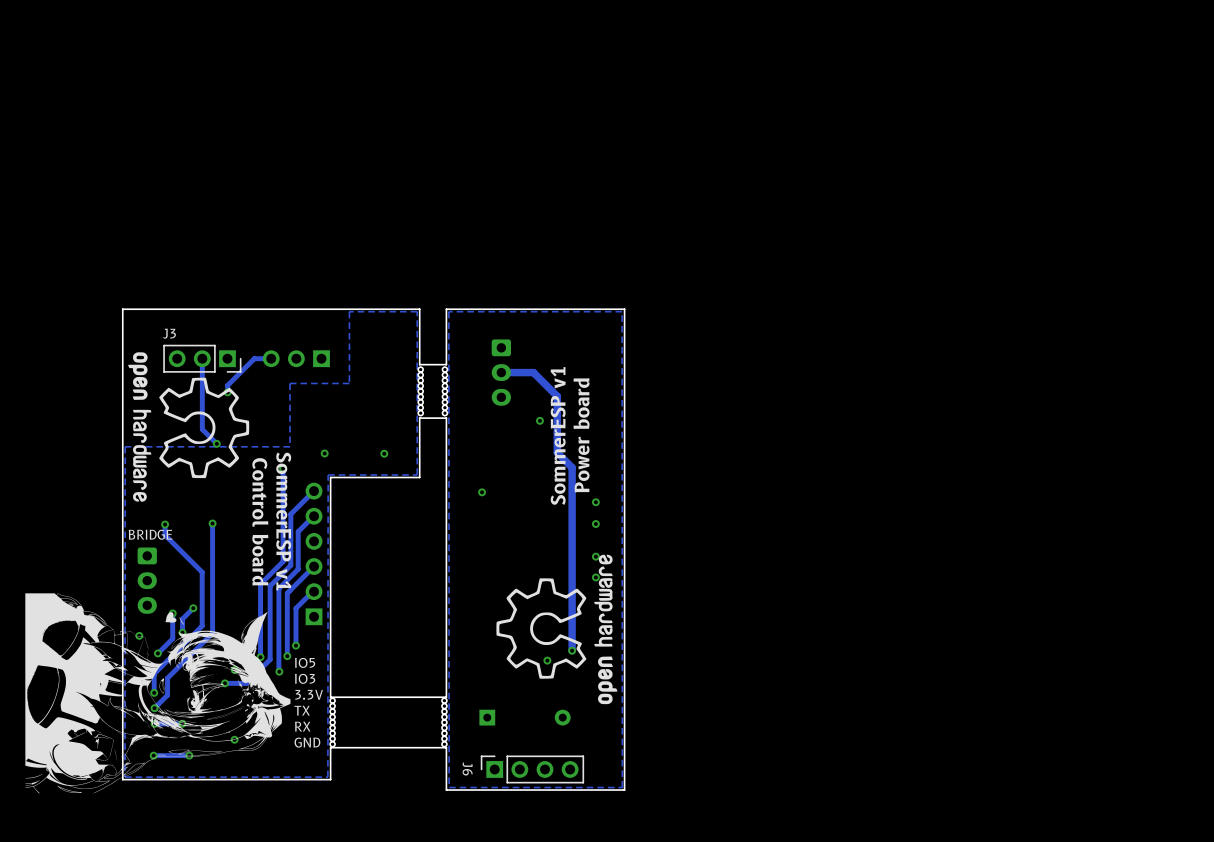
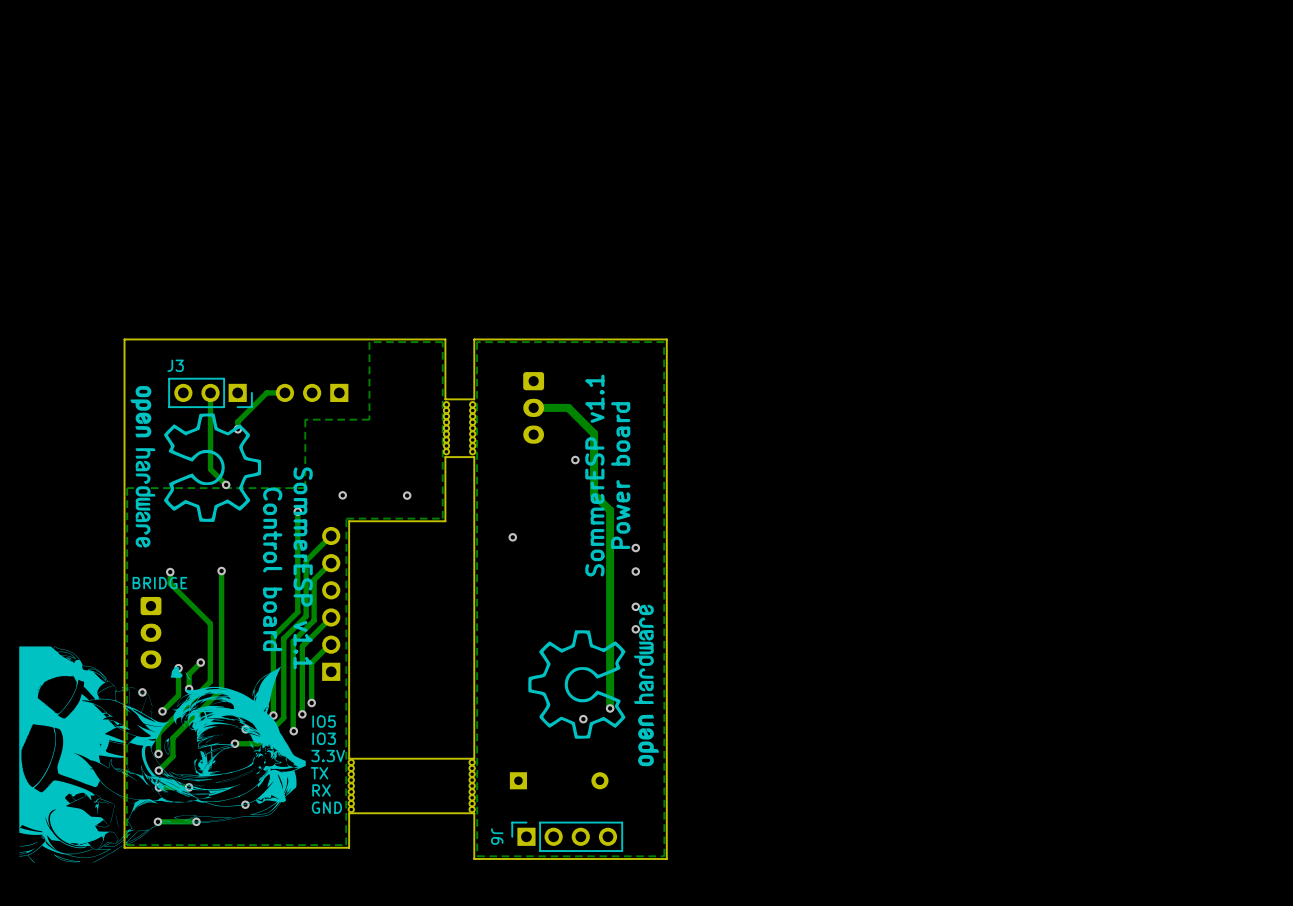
text: SommerESP v1 (558, 435) -> SommerESP v1.1 (594, 475)
text: SommerESP v1 (283, 521) -> SommerESP v1.1 (303, 568)

